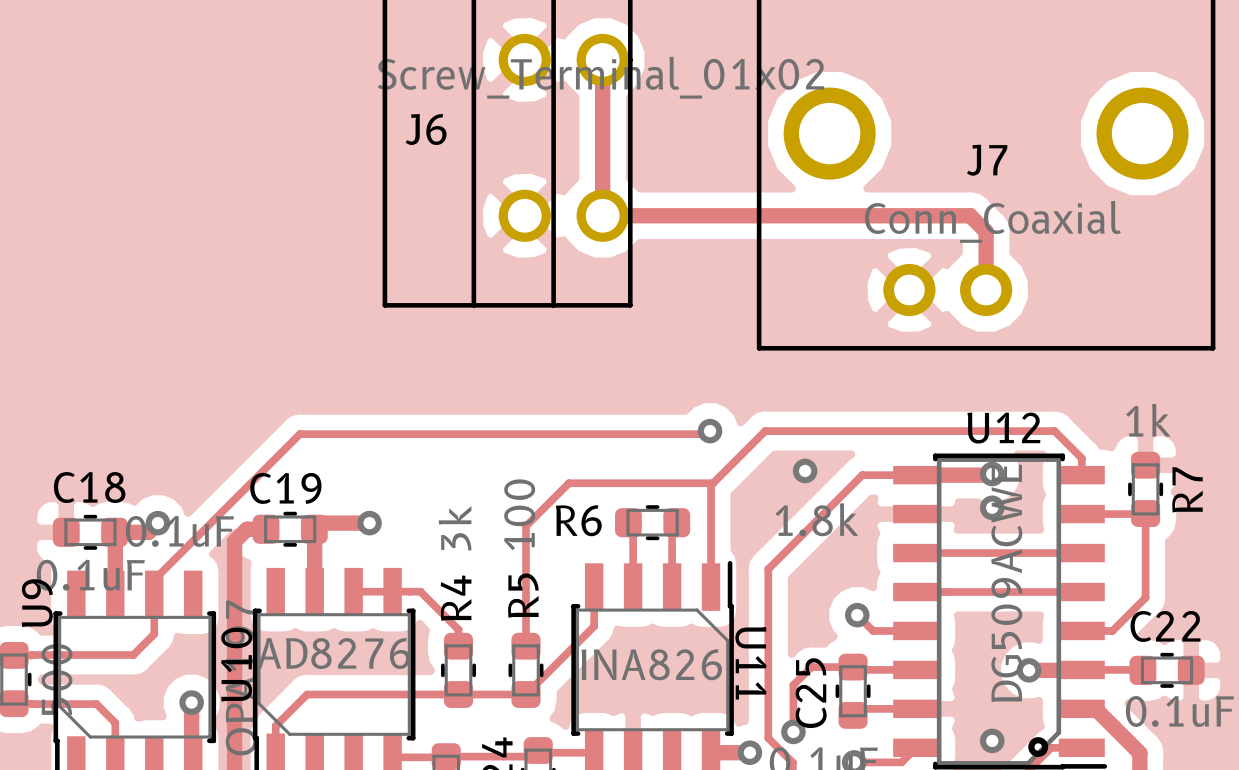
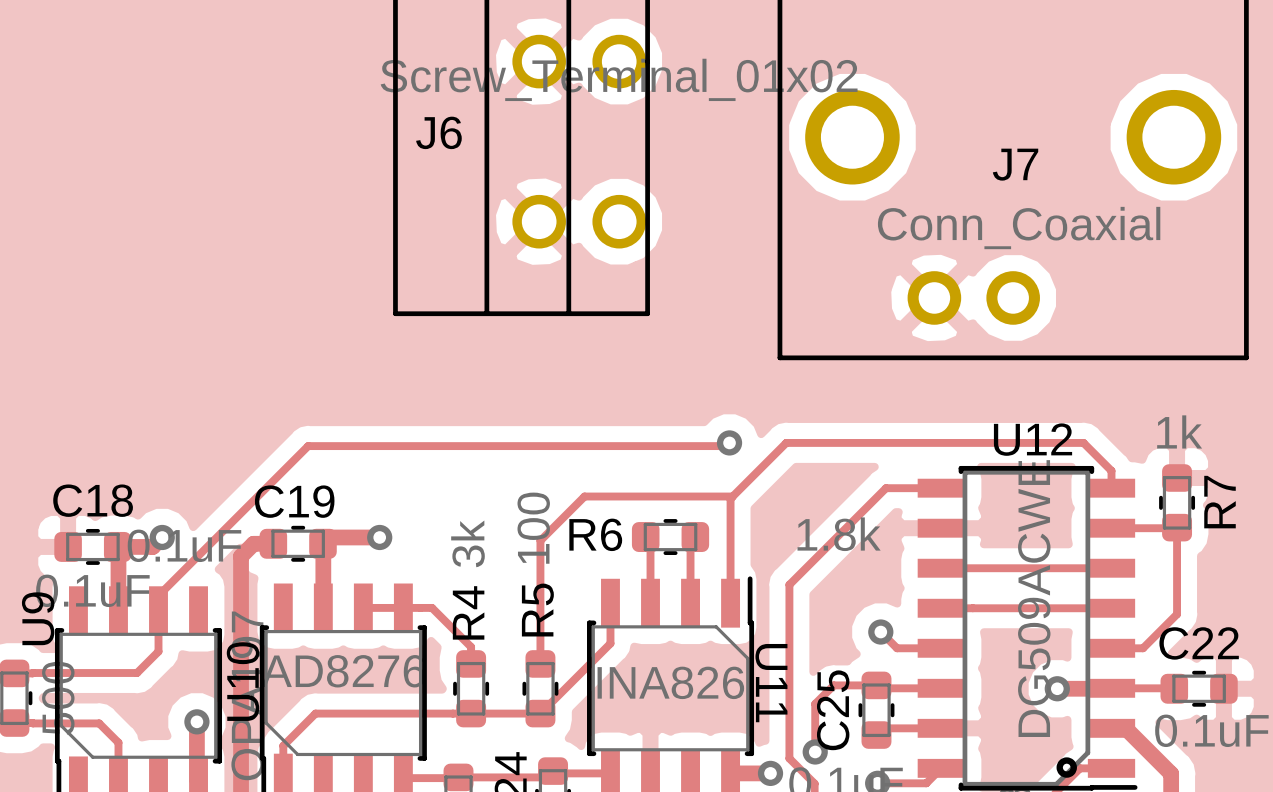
track: (602, 59) (602, 215) (970, 215) (986, 231) (986, 290) -> none
via: (805, 470) -> none
track: (992, 474) (916, 475) -> none
via: (992, 474) -> none
via: (992, 507) -> none
via: (992, 740) -> none

